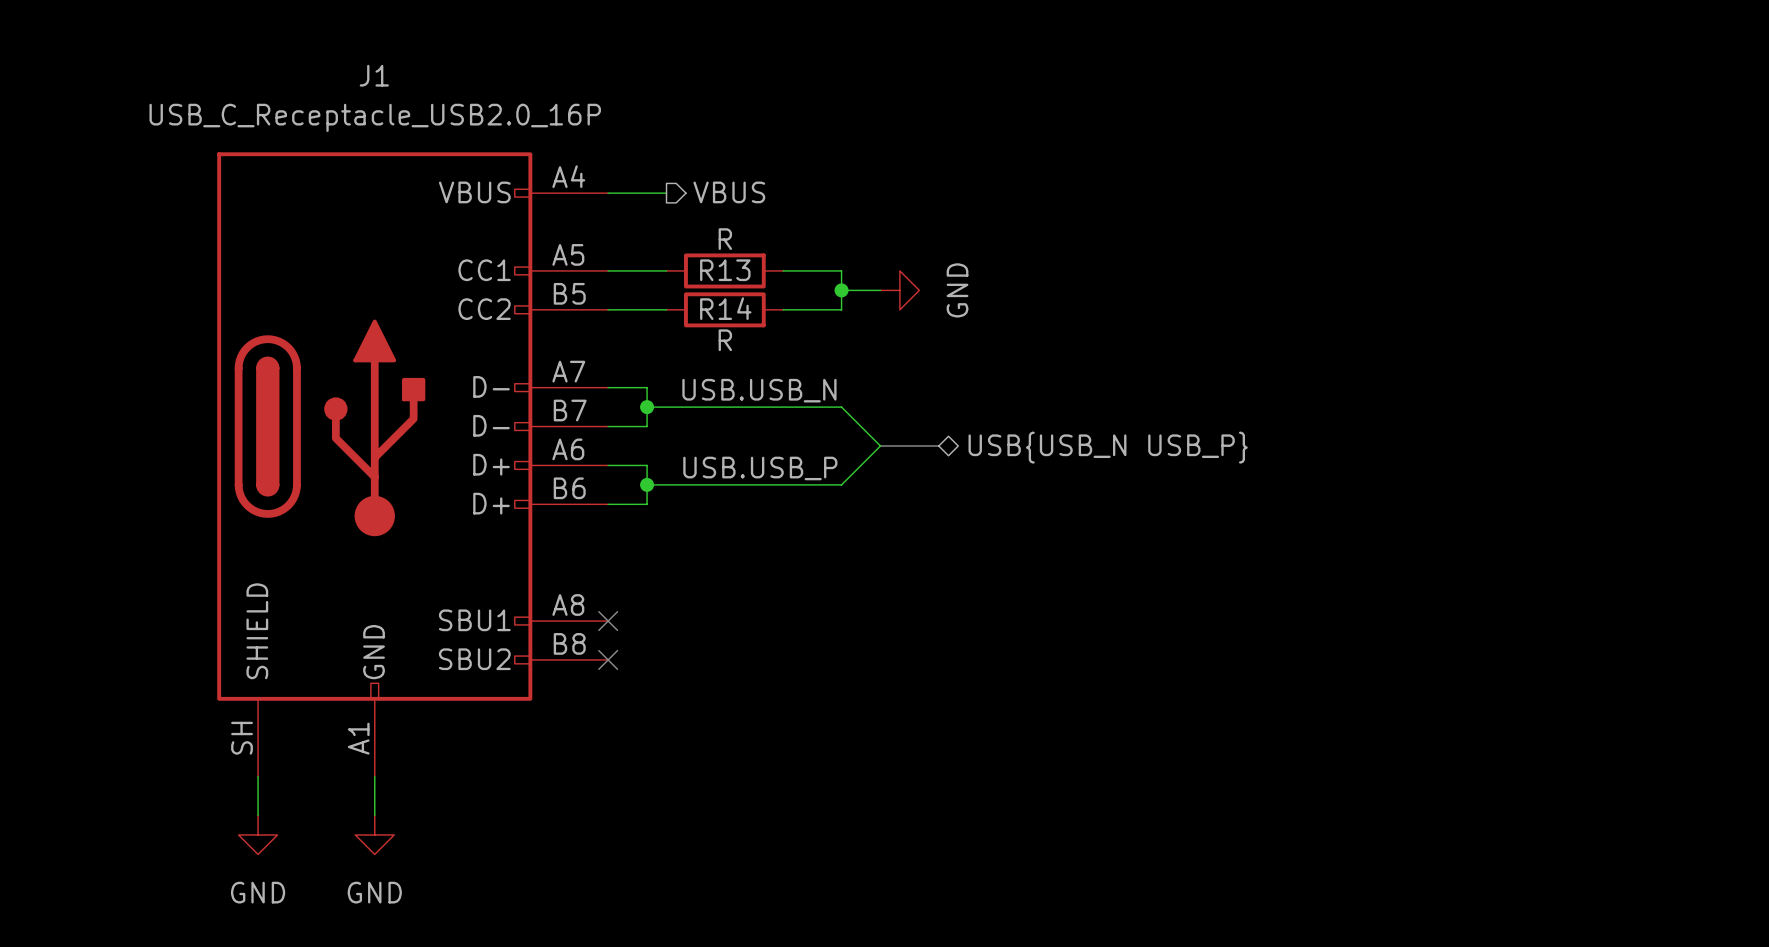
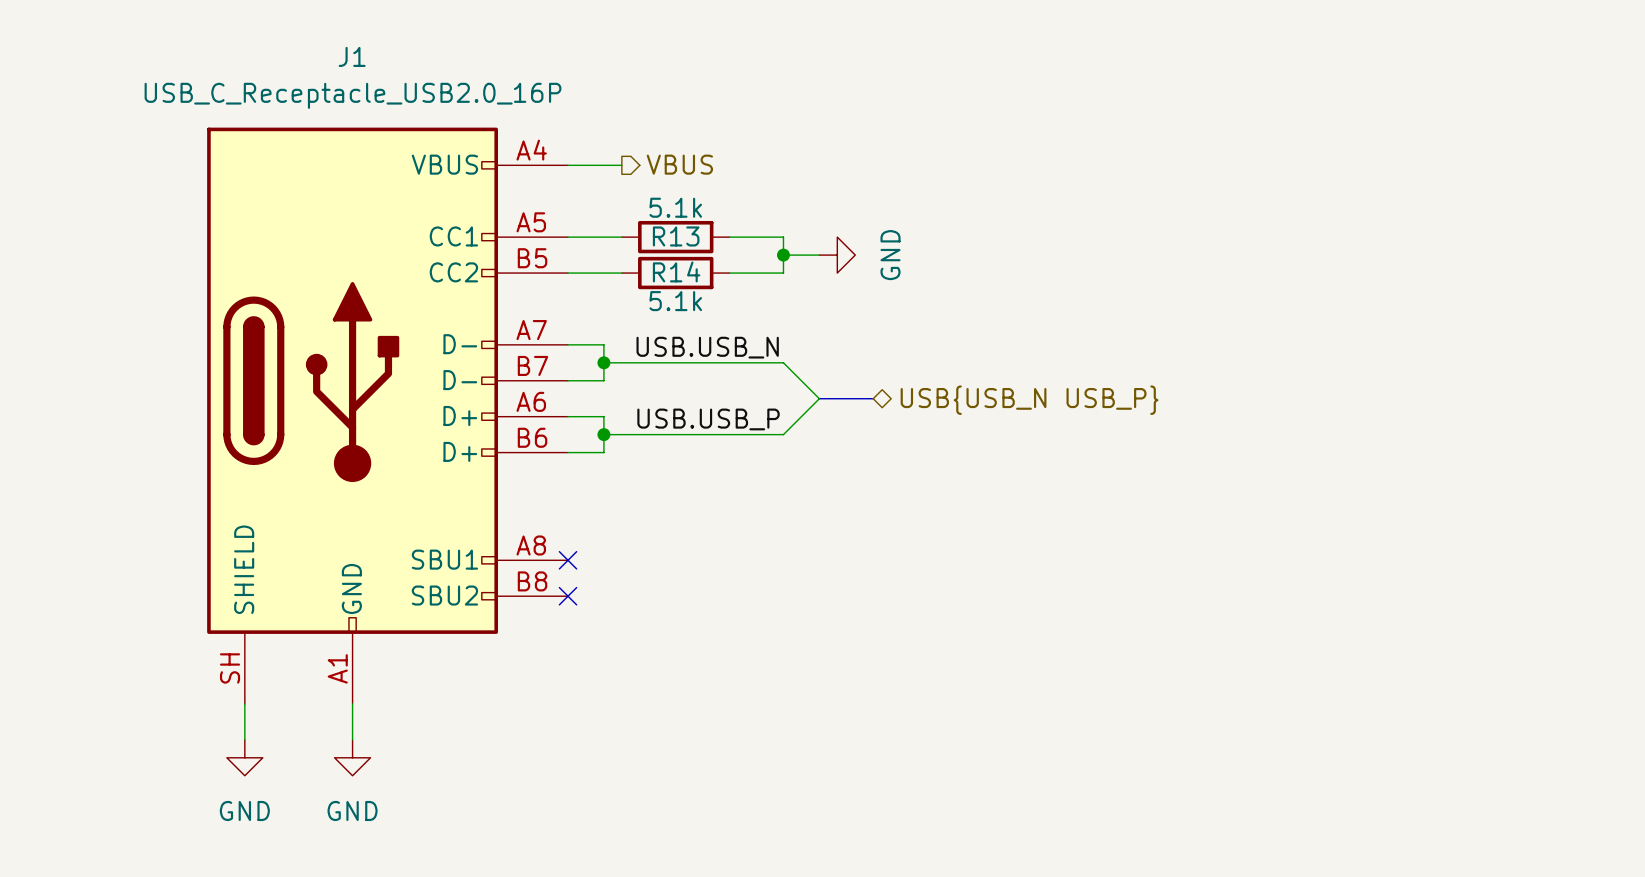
R13 value: R (725, 239) -> 5.1k (675, 207)
R14 value: R (725, 340) -> 5.1k (675, 301)

